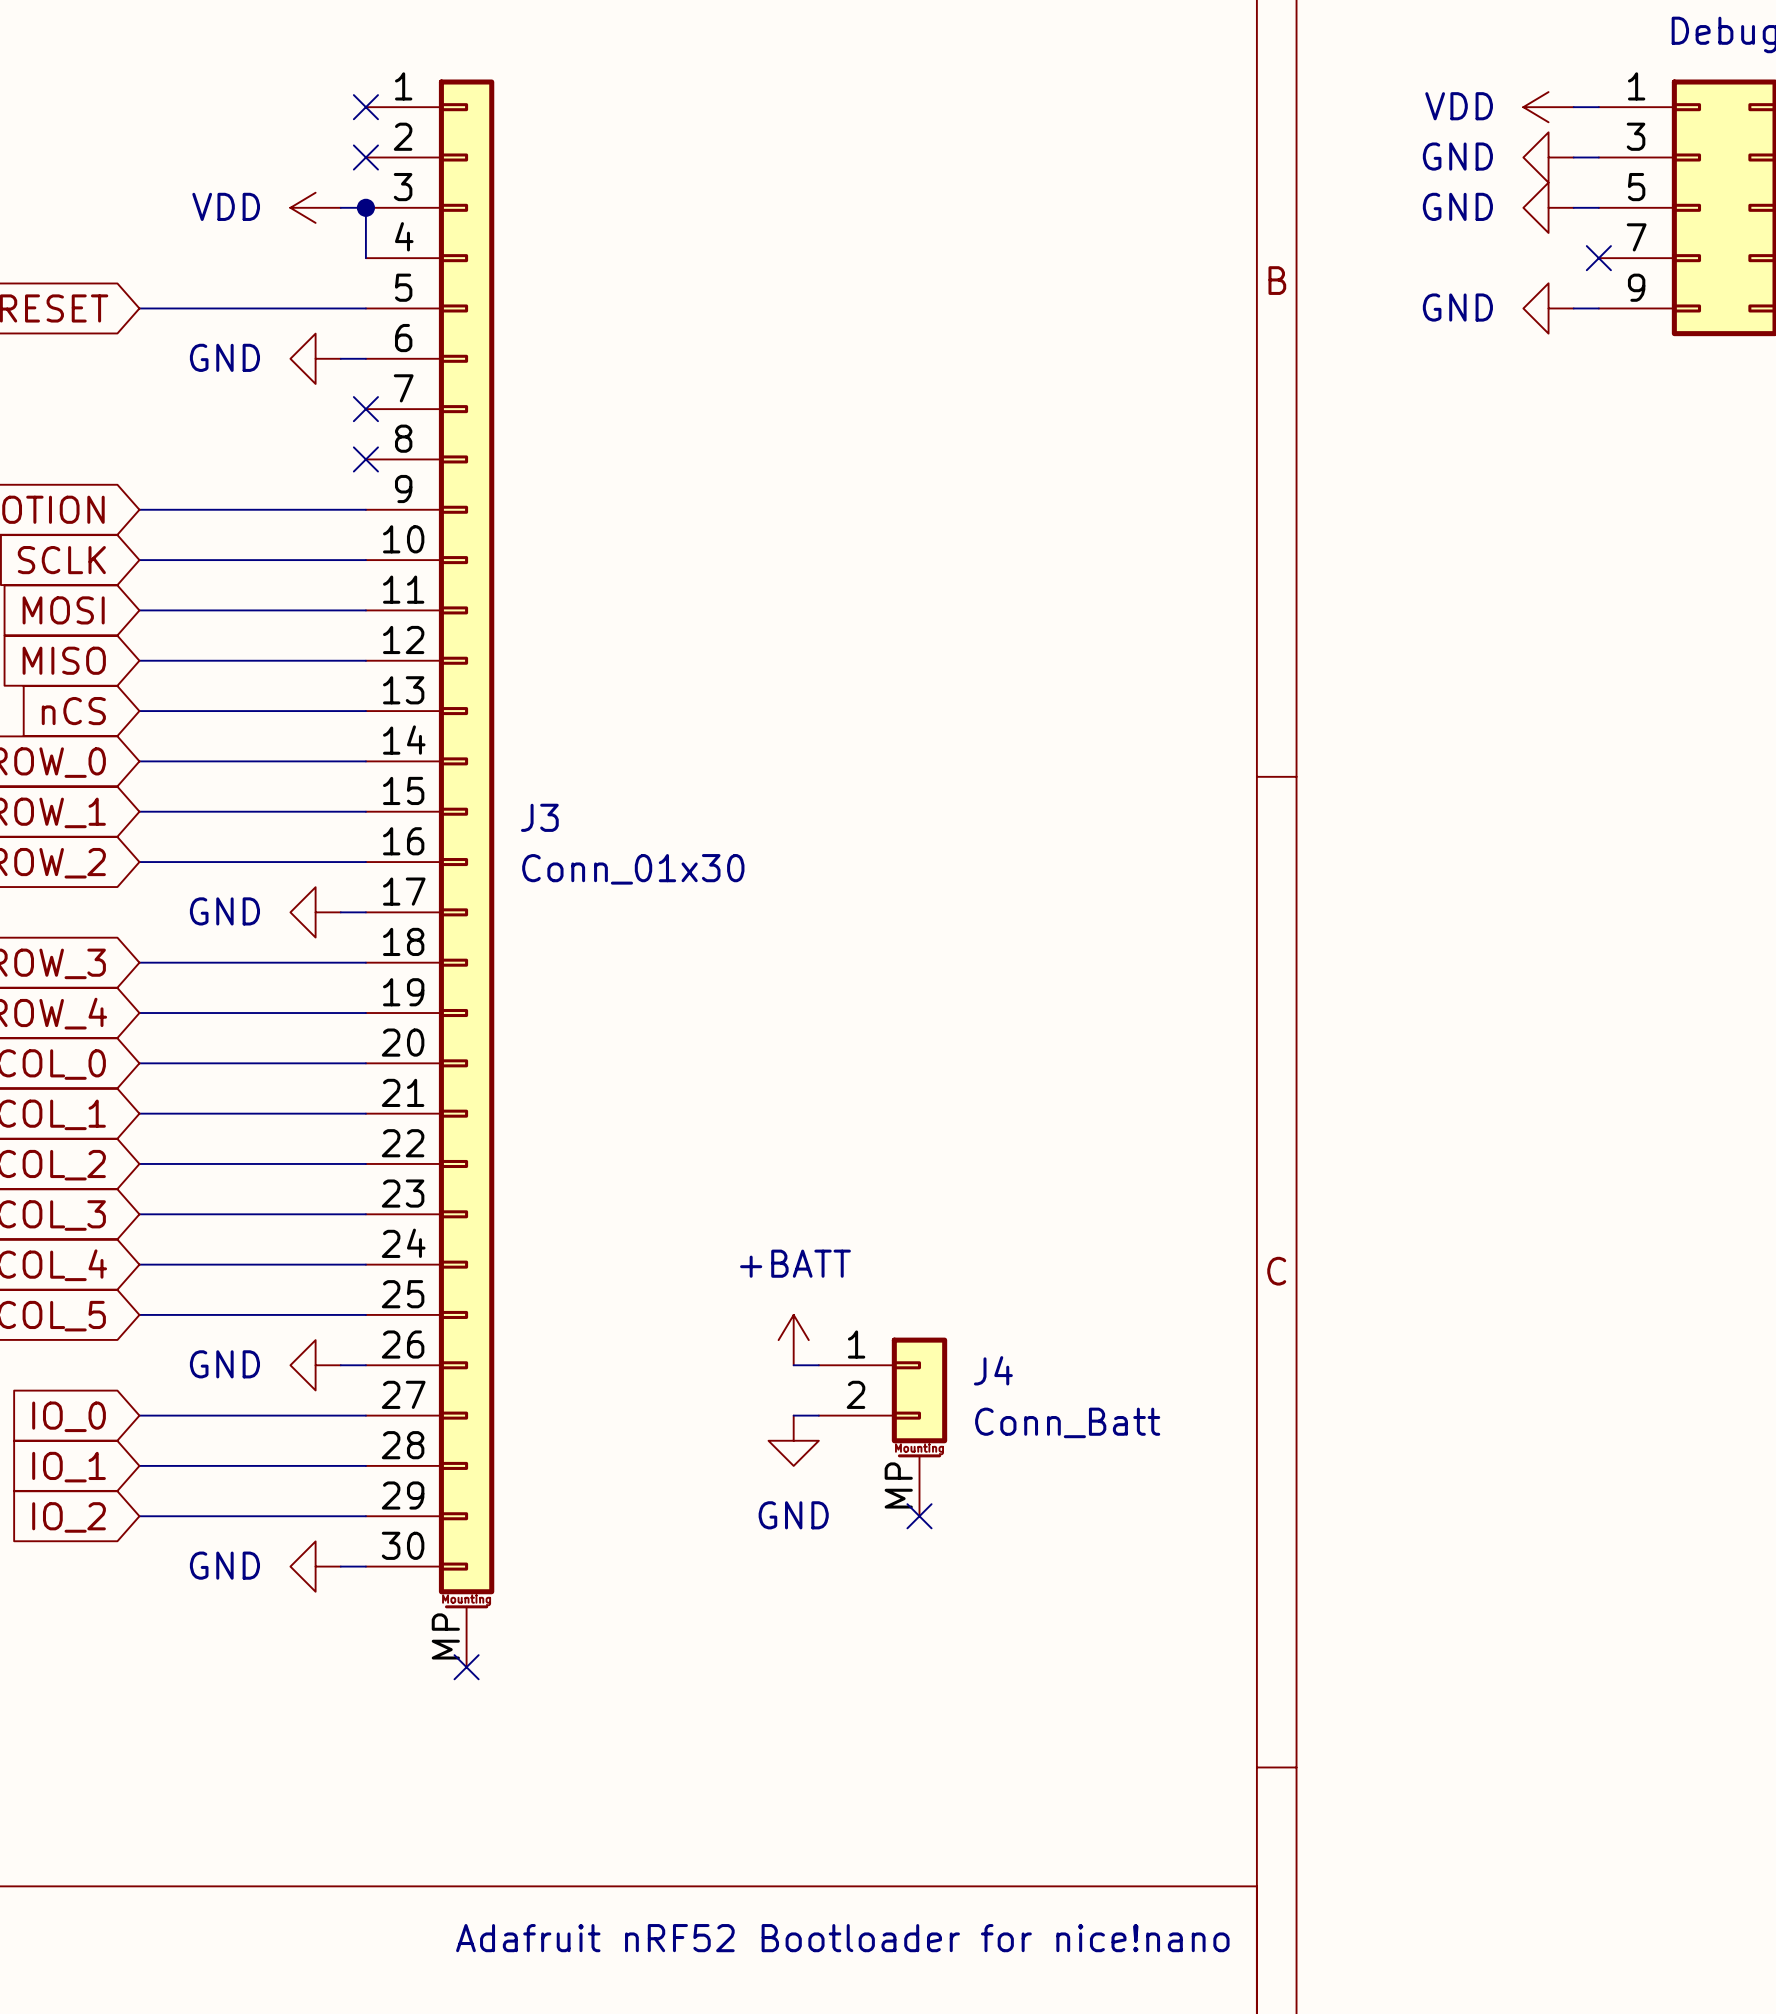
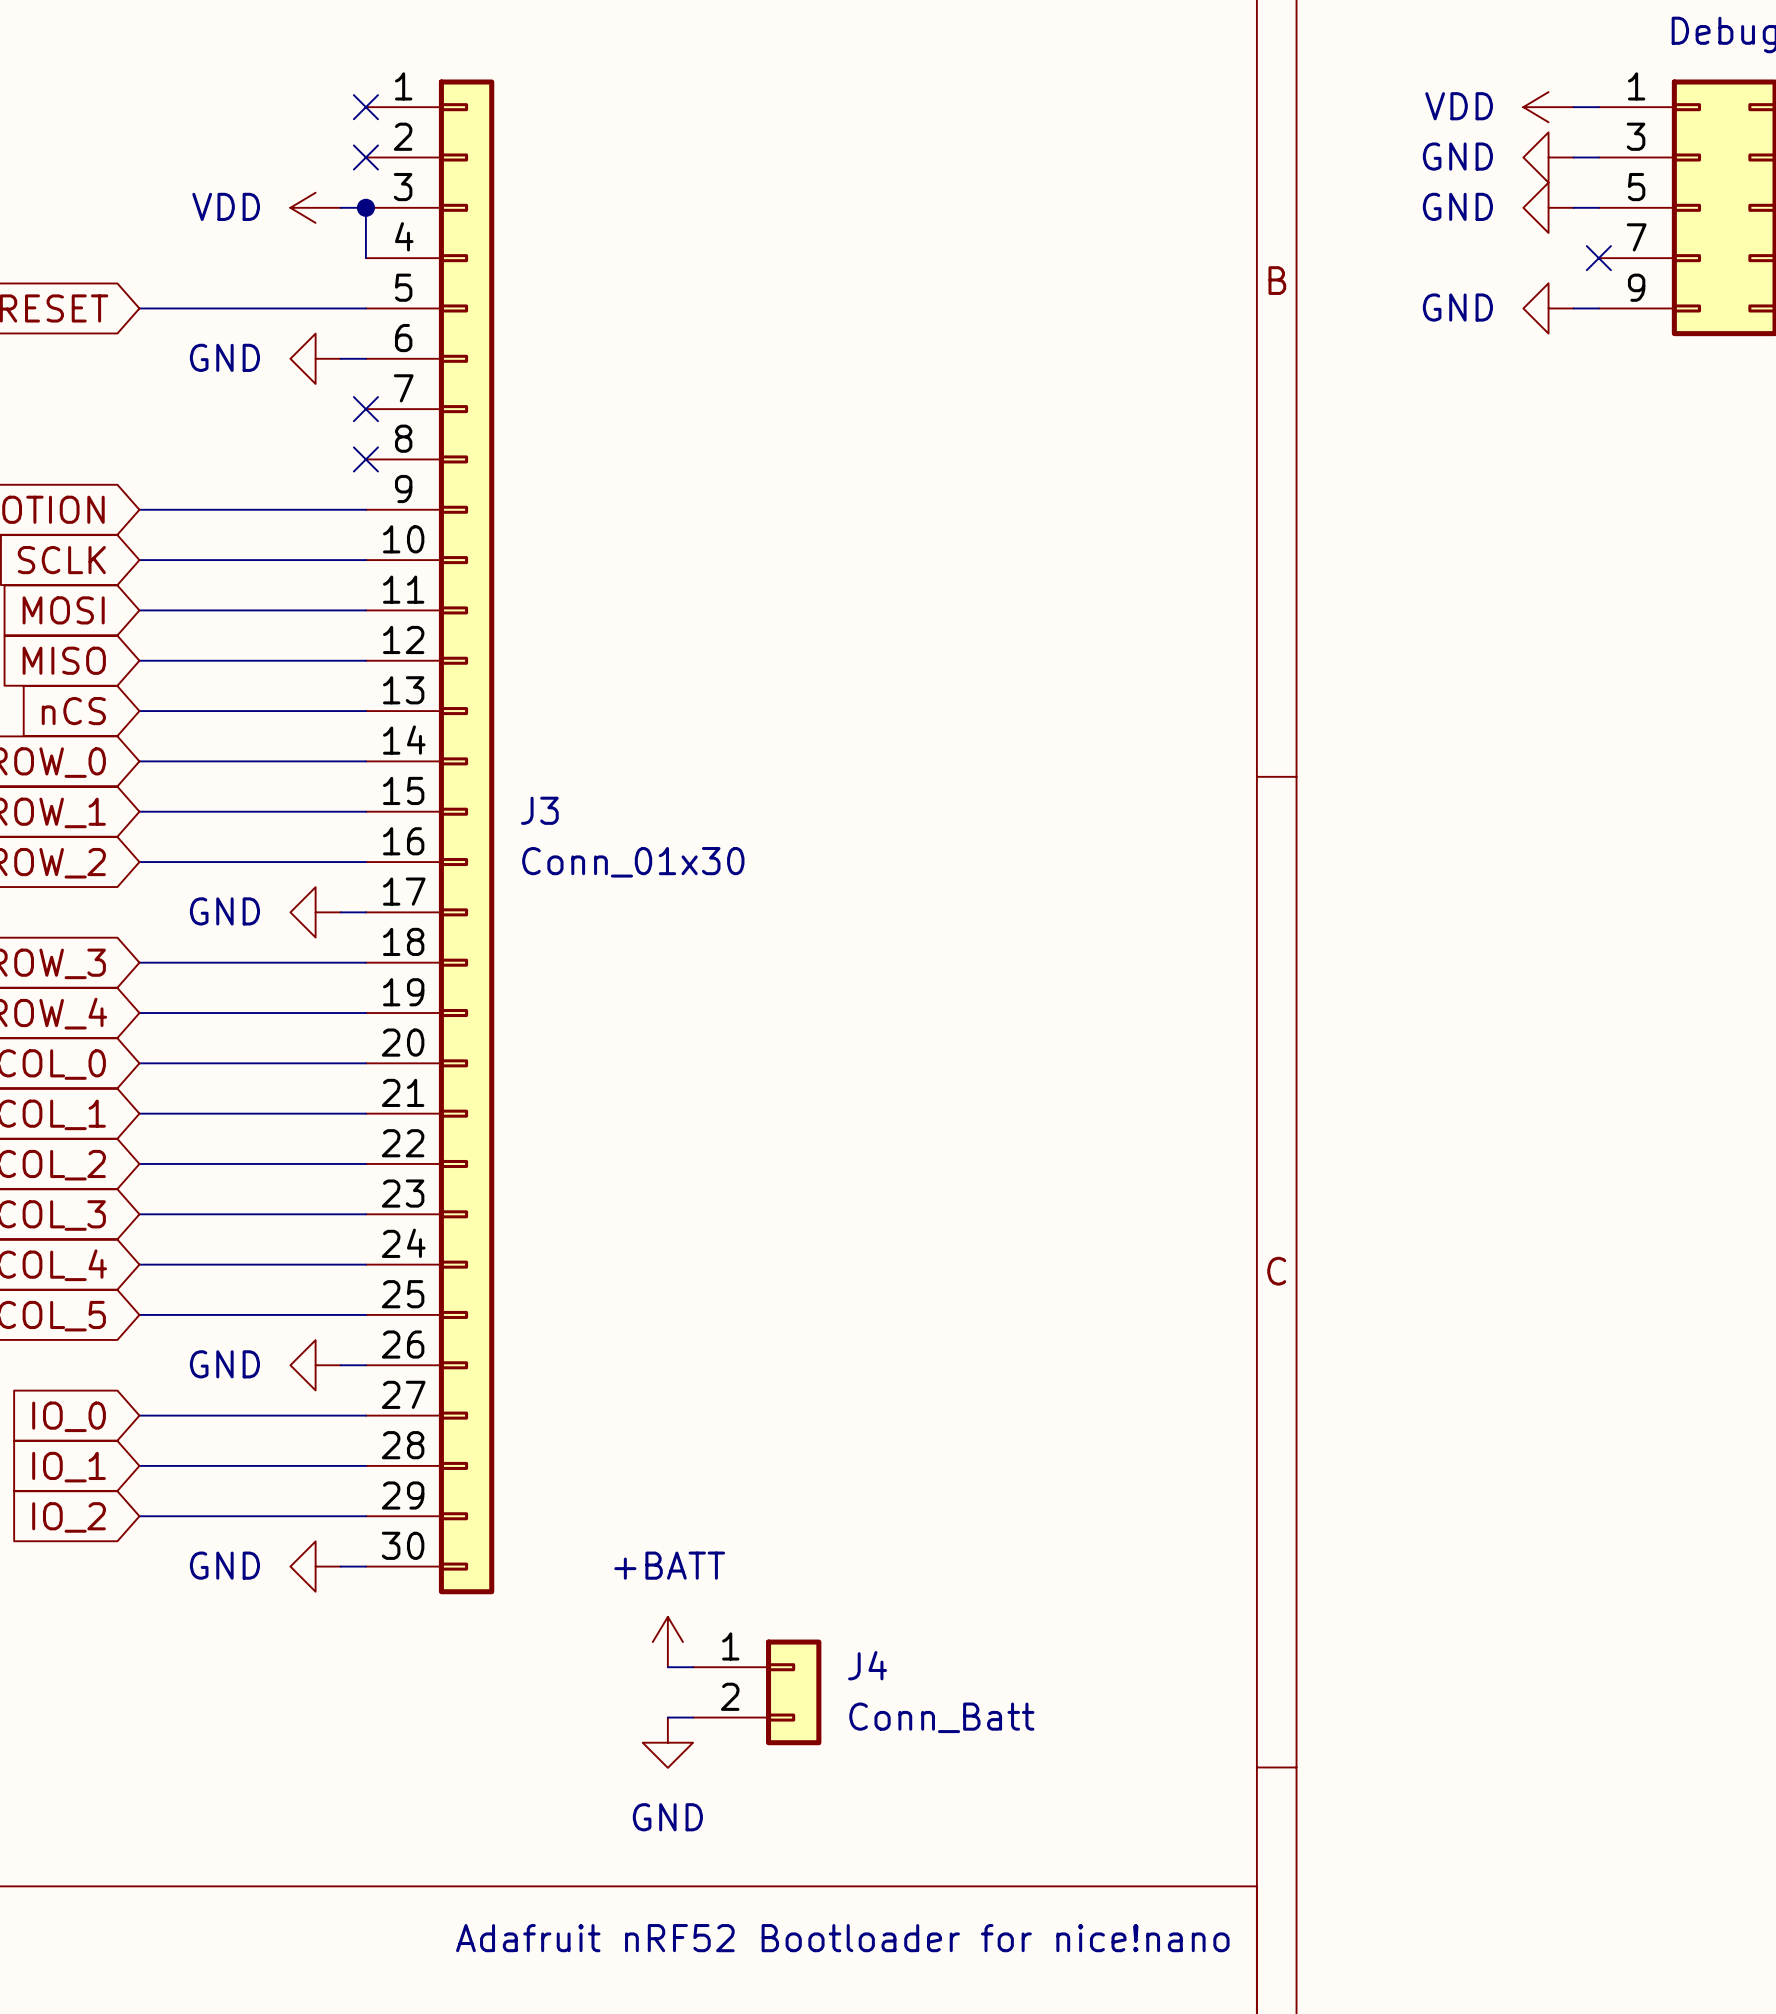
J3 symbol: [365, 79, 495, 1668] -> [365, 79, 495, 1595]
J4 symbol: [818, 1337, 948, 1517] -> [693, 1639, 822, 1746]
power symbol position: +BATT (793, 1340) -> +BATT (667, 1642)
wire: (793, 1365) (818, 1365) -> (667, 1667) (693, 1667)
wire: (793, 1415) (818, 1415) -> (667, 1717) (693, 1717)
power symbol position: GND (793, 1440) -> GND (667, 1742)
no-connect mark: (919, 1516) -> none
no-connect mark: (466, 1667) -> none

